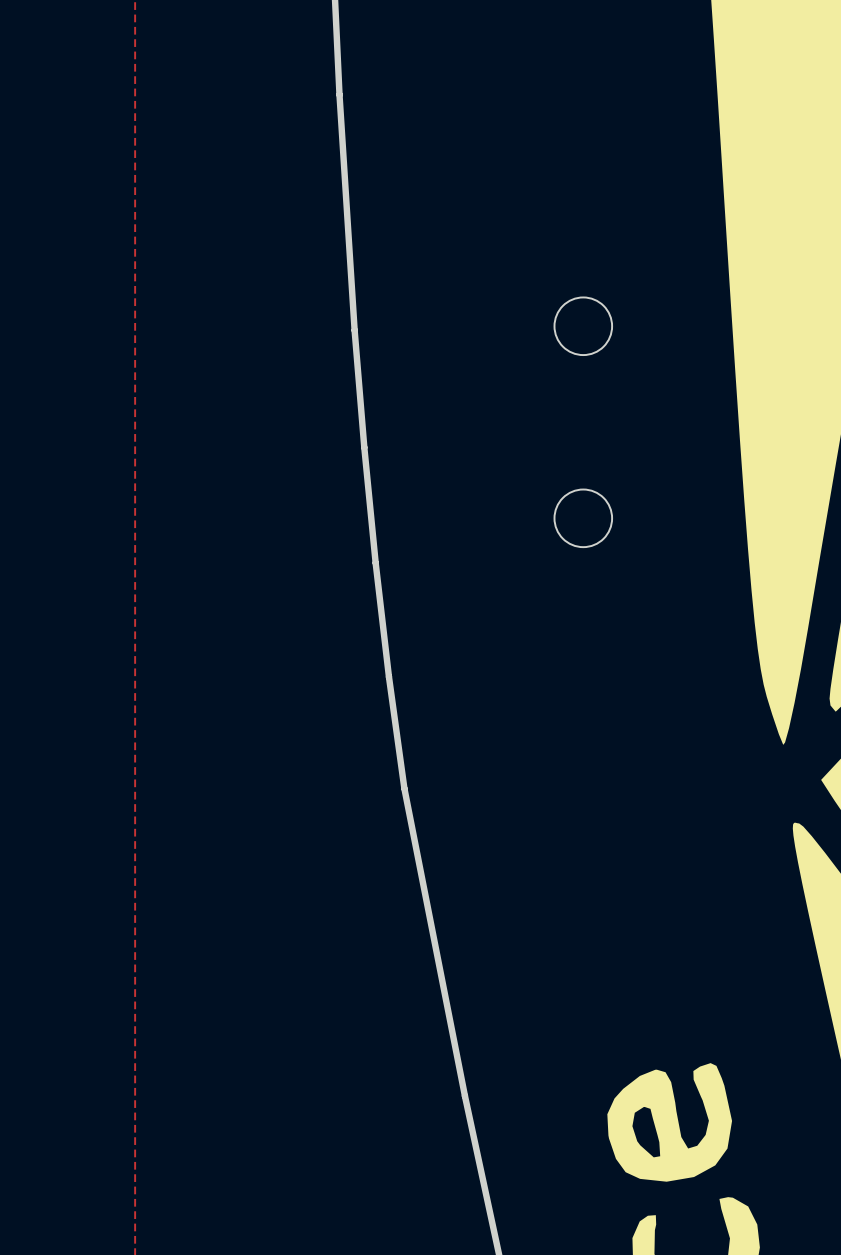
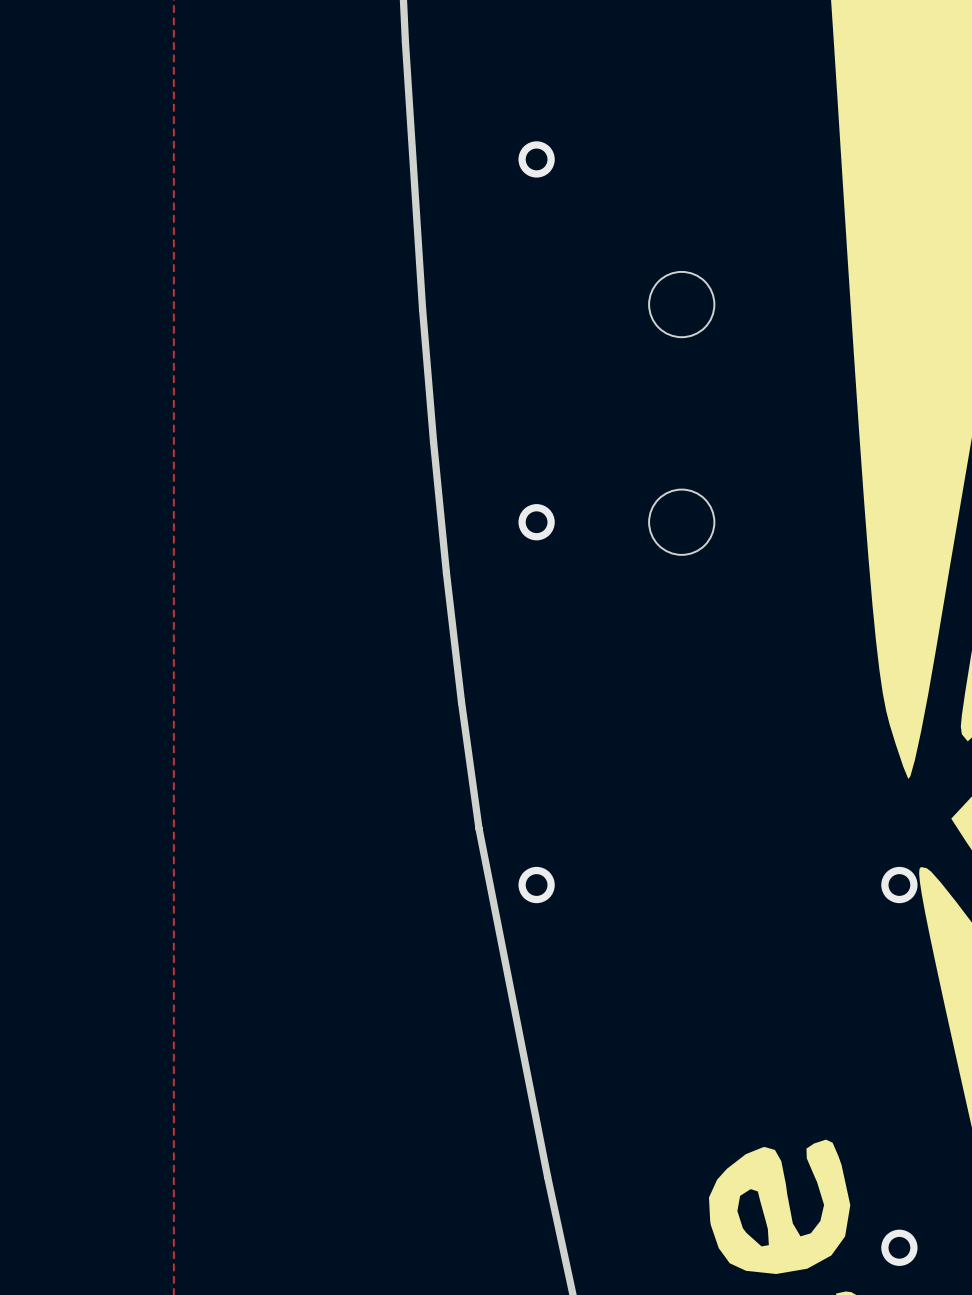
via: none -> (536, 159)
via: none -> (536, 522)
via: none -> (536, 885)
via: none -> (899, 885)
via: none -> (899, 1247)

